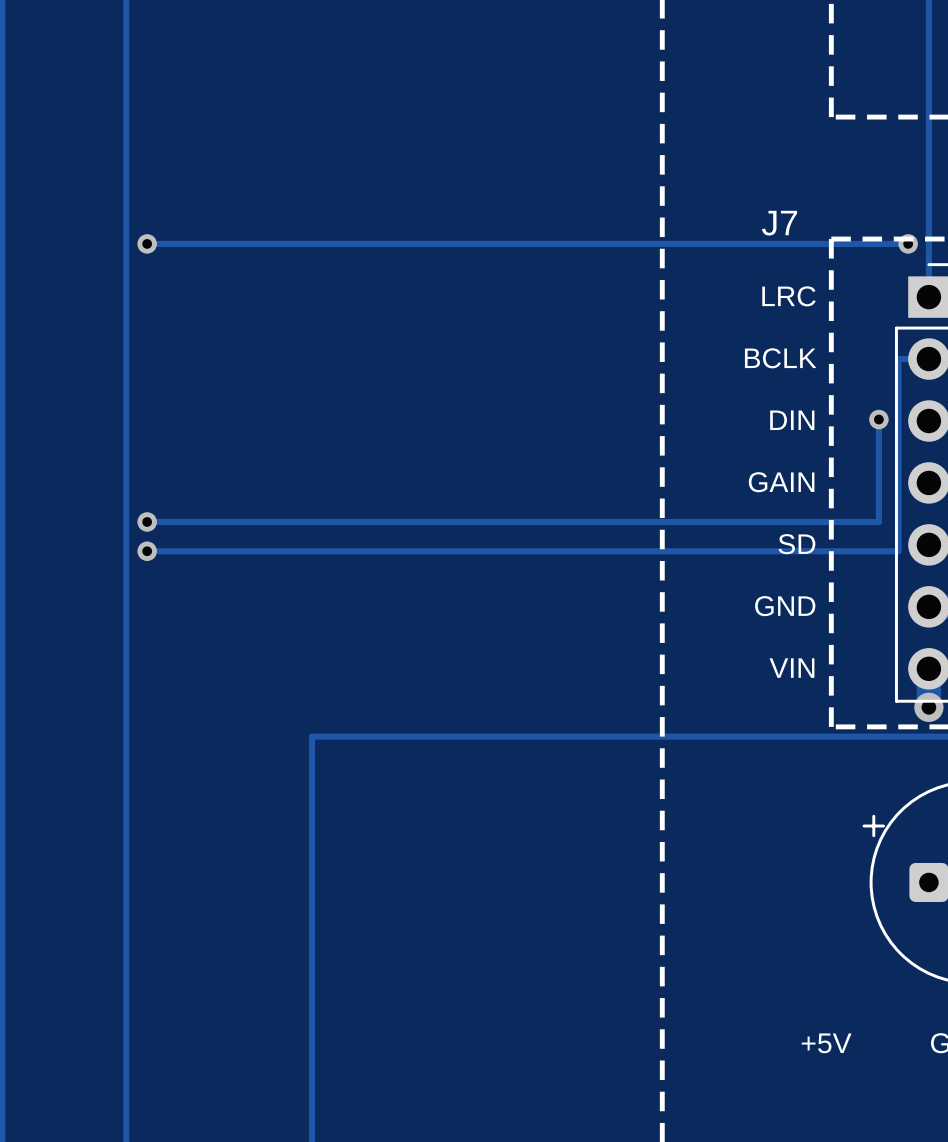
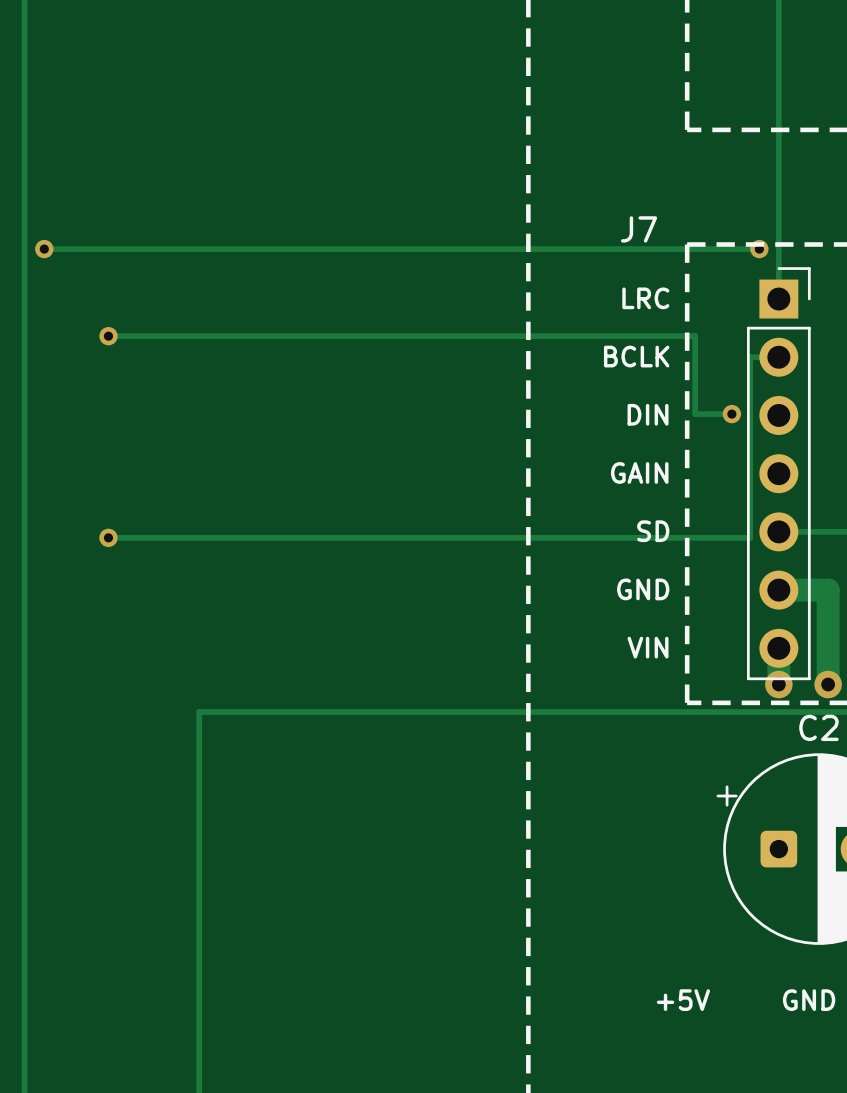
via: none -> (108, 336)
track: (878, 419) (878, 521) (147, 521) -> (731, 414) (695, 414) (695, 336) (108, 336)
via: (147, 521) -> none
track: (147, 551) (215, 551) -> none
via: (147, 551) -> none
via: none -> (108, 537)

